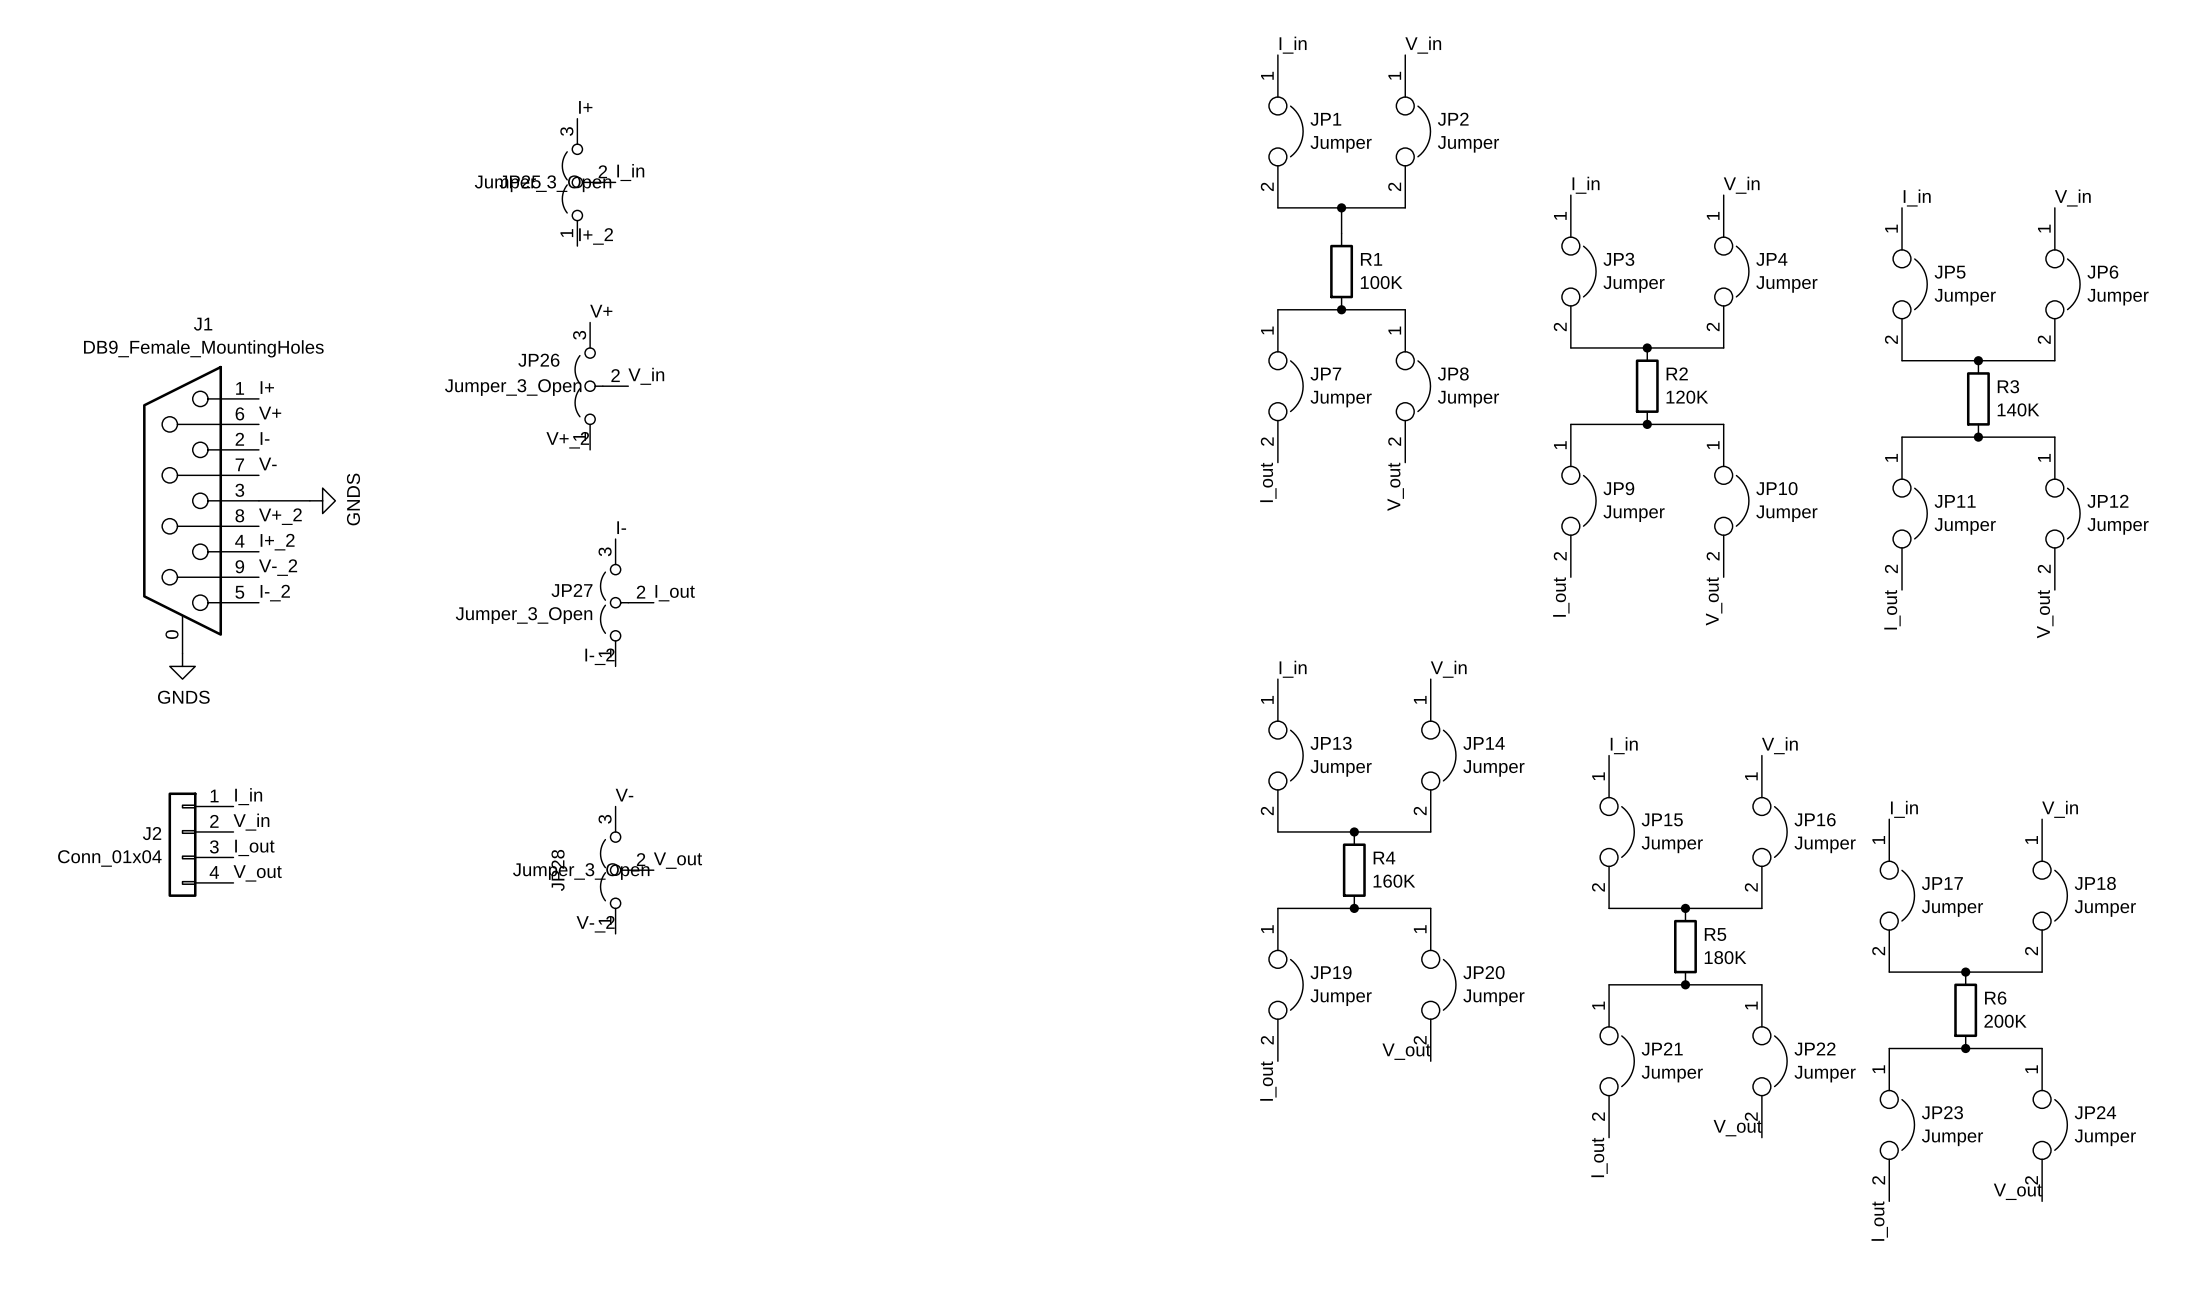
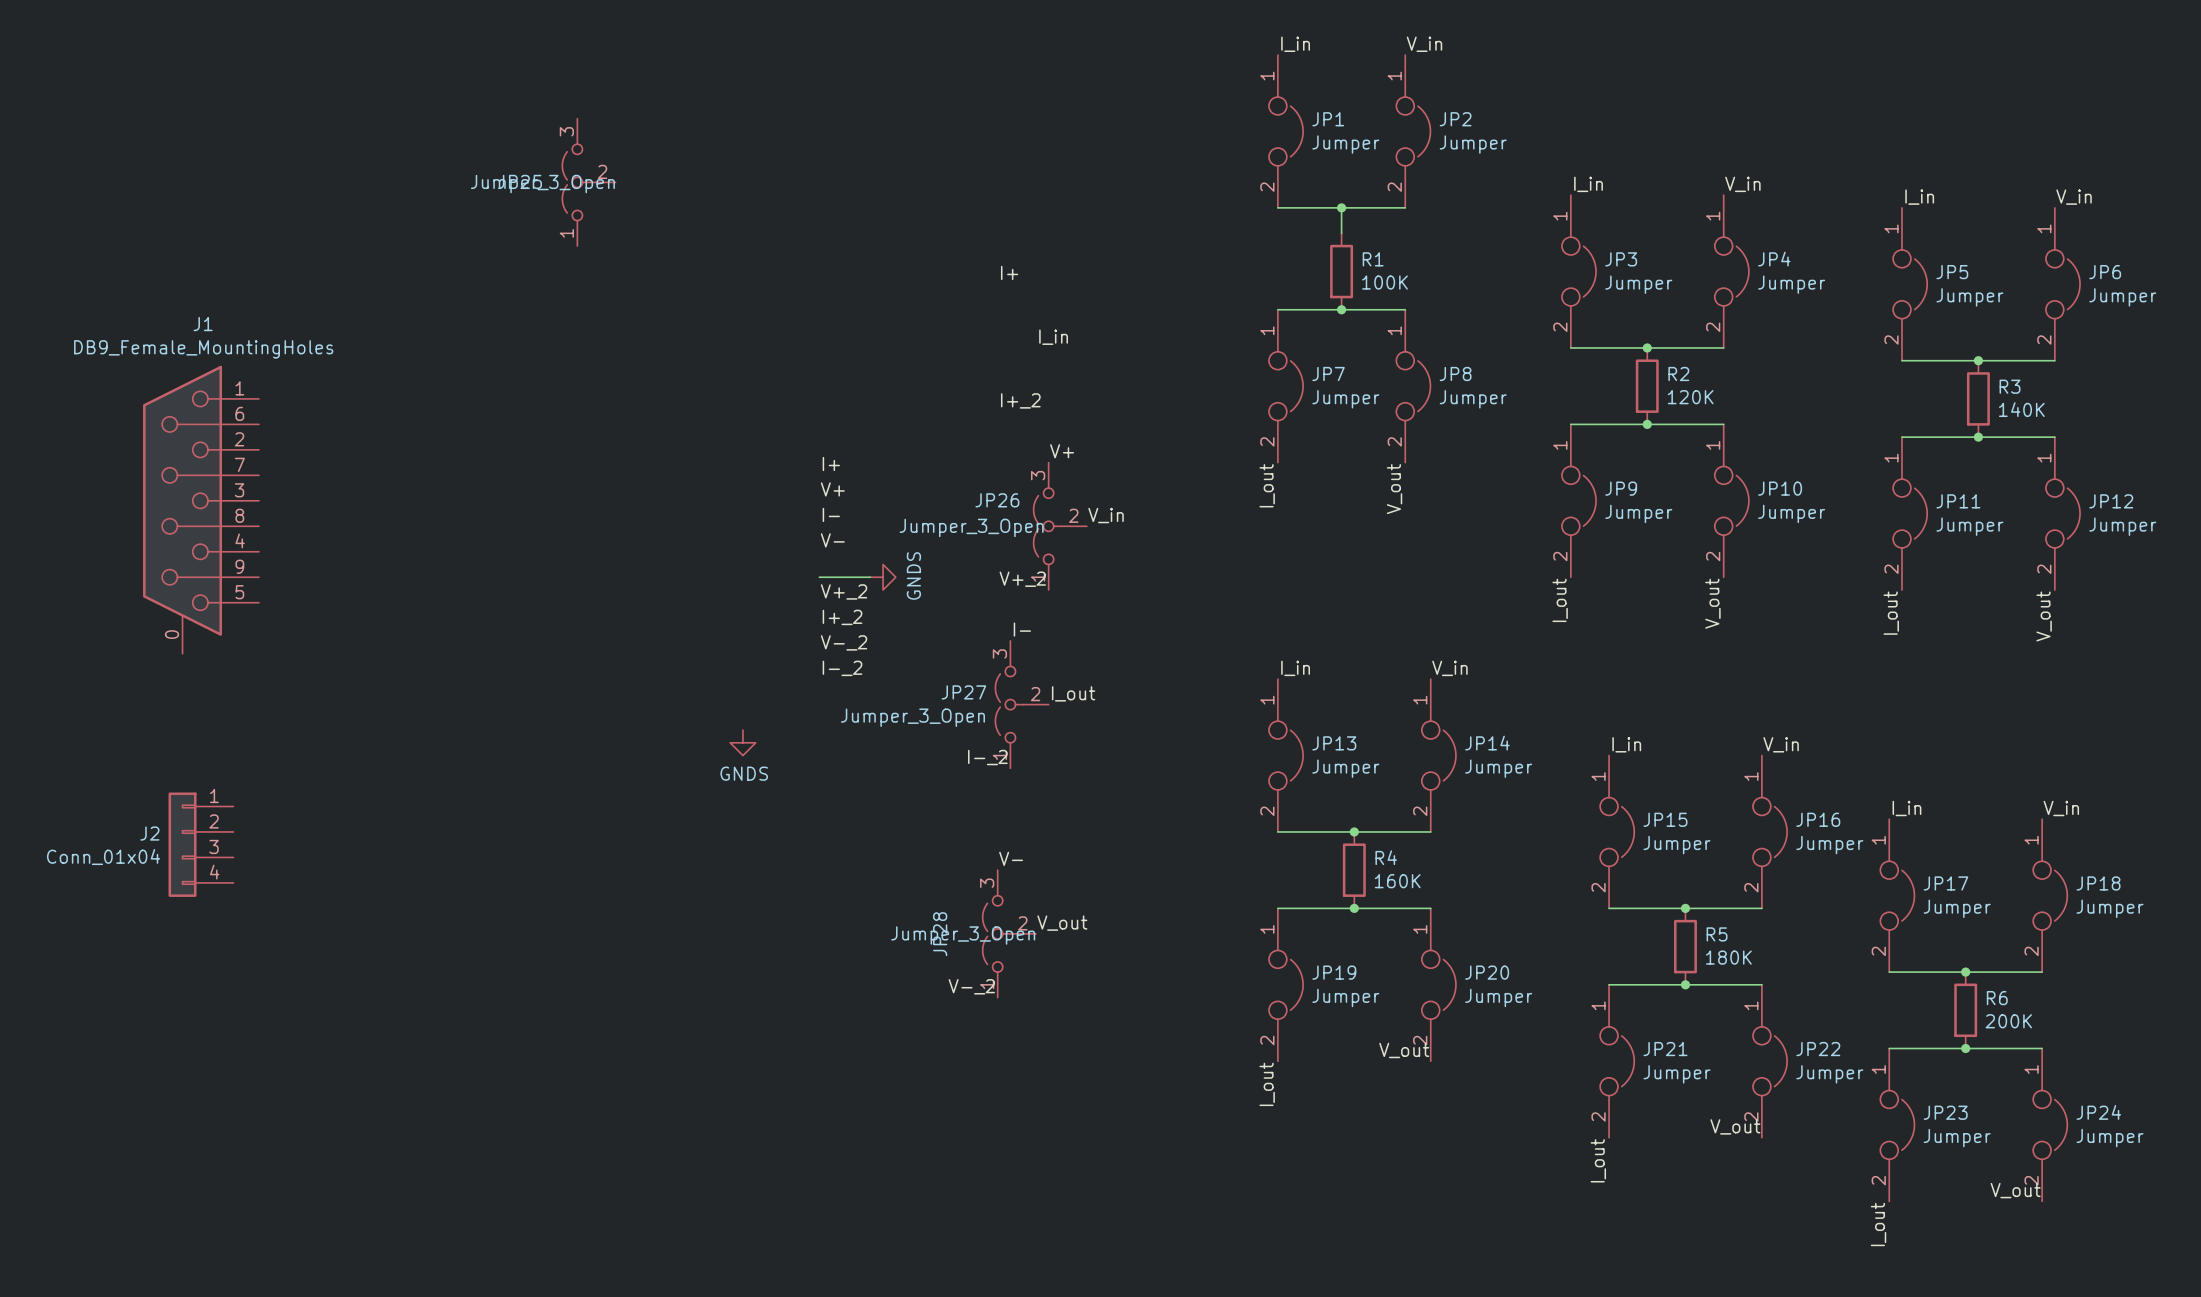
label: I+ (585, 107) -> none
label: I_in (630, 172) -> none
label: I+_2 (596, 236) -> none
label: none -> I+ (1009, 272)
label: V+ (601, 311) -> none
label: none -> I_in (1053, 337)
label: V_in (646, 376) -> none
JP26 position: (601, 386) -> (1060, 526)
label: I+ (267, 387) -> none
label: none -> I+_2 (1020, 400)
label: V+ (270, 413) -> none
label: I- (265, 438) -> none
label: V+_2 (567, 440) -> none
label: none -> V+ (1062, 451)
label: V- (267, 463) -> none
label: none -> I+ (831, 463)
label: none -> V+ (832, 489)
wire: (258, 500) (309, 500) -> none
power symbol: GNDS (322, 500) -> none
label: none -> I- (831, 514)
label: V+_2 (280, 516) -> none
label: none -> V_in (1106, 515)
label: I- (621, 527) -> none
label: none -> V- (832, 540)
label: I+_2 (277, 542) -> none
label: V-_2 (278, 567) -> none
wire: none -> (819, 577) (870, 577)
power symbol: none -> GNDS (883, 577)
label: none -> V+_2 (1022, 579)
label: I-_2 (275, 593) -> none
label: I_out (675, 593) -> none
label: none -> V+_2 (844, 591)
JP27 position: (627, 602) -> (1022, 704)
label: none -> I+_2 (842, 617)
label: none -> I- (1022, 629)
label: none -> V-_2 (844, 642)
label: I-_2 (600, 656) -> none
power symbol: GNDS (182, 666) -> none
label: none -> I-_2 (842, 668)
label: none -> I_out (1073, 693)
power symbol: none -> GNDS (742, 742)
label: none -> I-_2 (987, 757)
label: V- (624, 795) -> none
label: I_in (248, 796) -> none
label: V_in (251, 822) -> none
label: I_out (254, 847) -> none
label: none -> V- (1011, 858)
label: V_out (677, 860) -> none
JP28 position: (627, 870) -> (1009, 933)
label: V_out (257, 873) -> none
label: V-_2 (595, 924) -> none
label: none -> V_out (1062, 923)
label: none -> V-_2 (971, 986)

